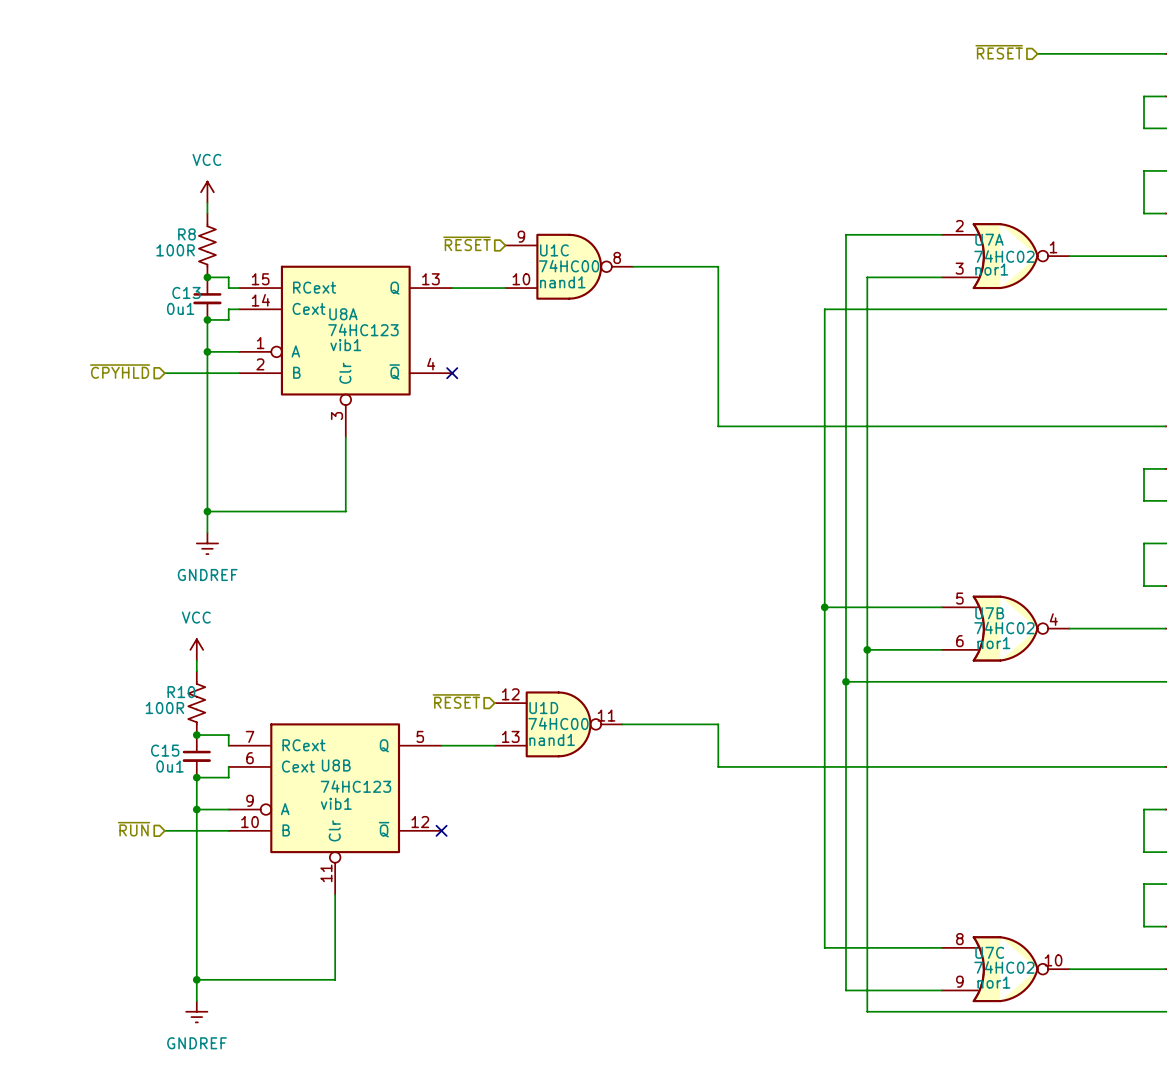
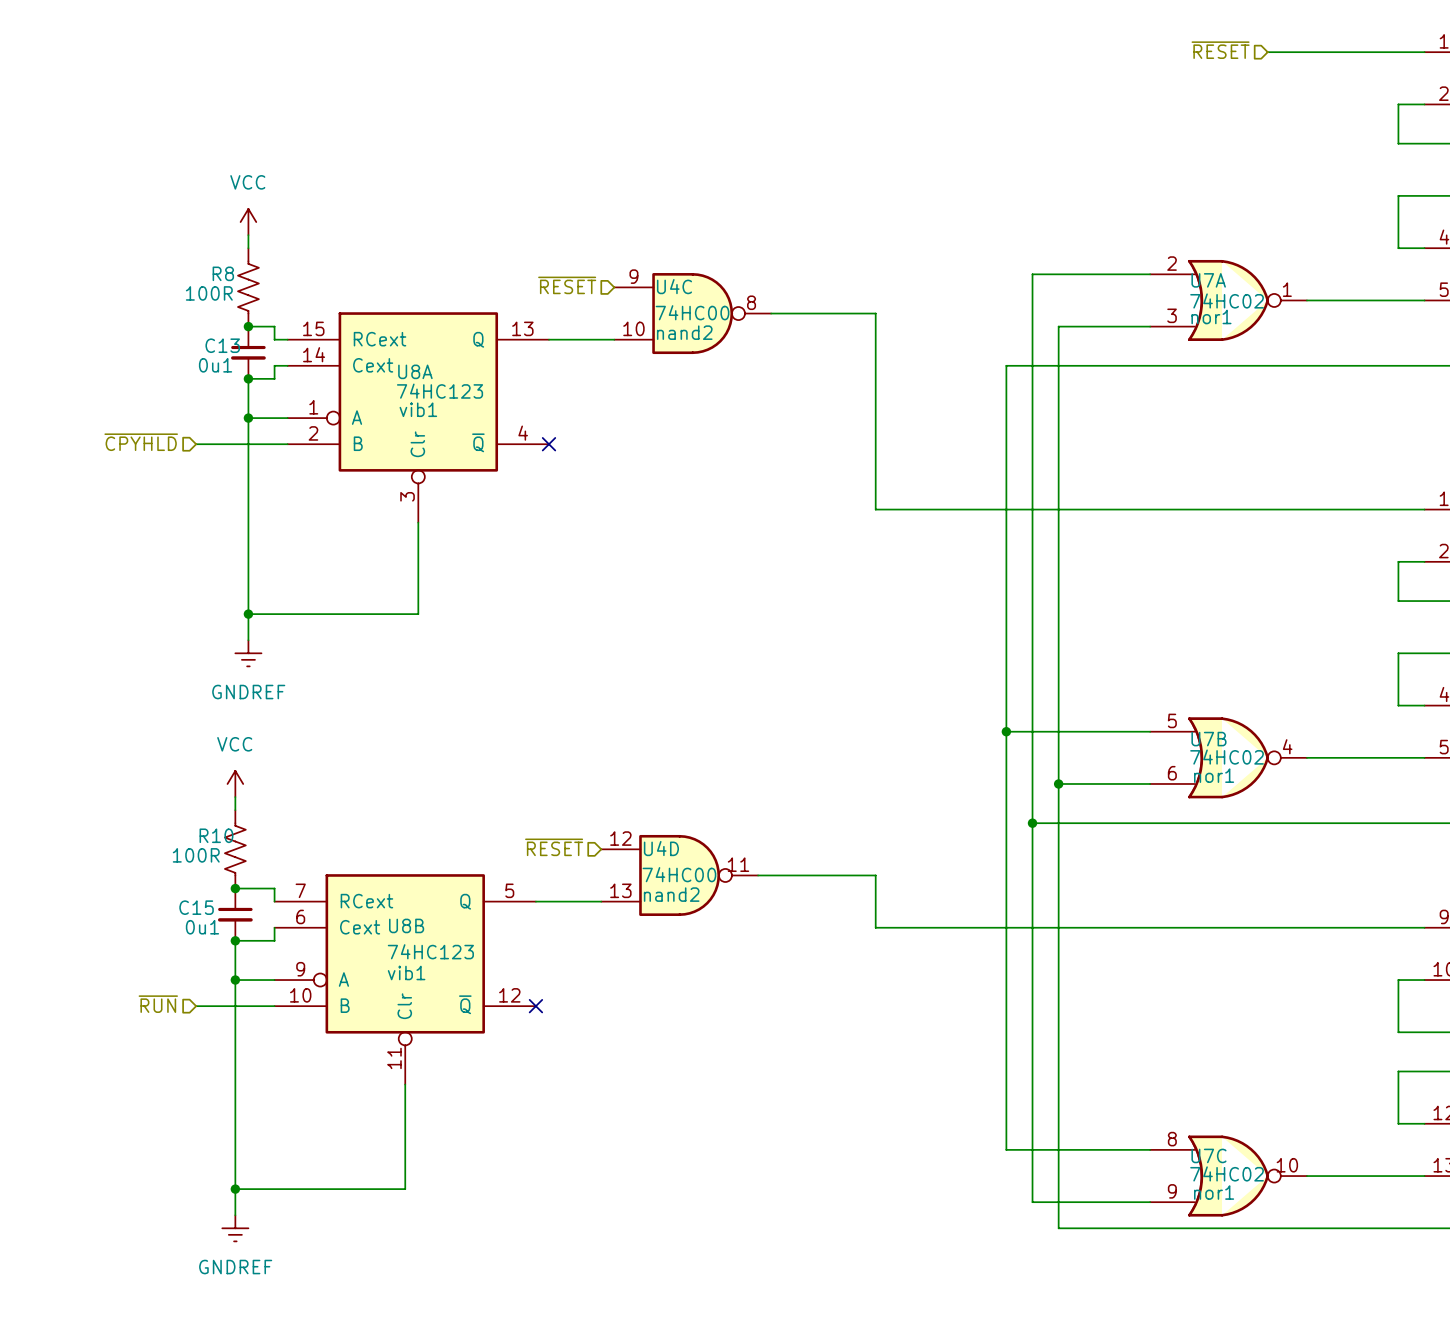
U1C name: U1C (554, 250) -> U4C (674, 286)
U1C text: nand1 (562, 282) -> nand2 (684, 332)
U1D name: U1D (543, 708) -> U4D (661, 848)
U1D text: nand1 (552, 739) -> nand2 (671, 894)

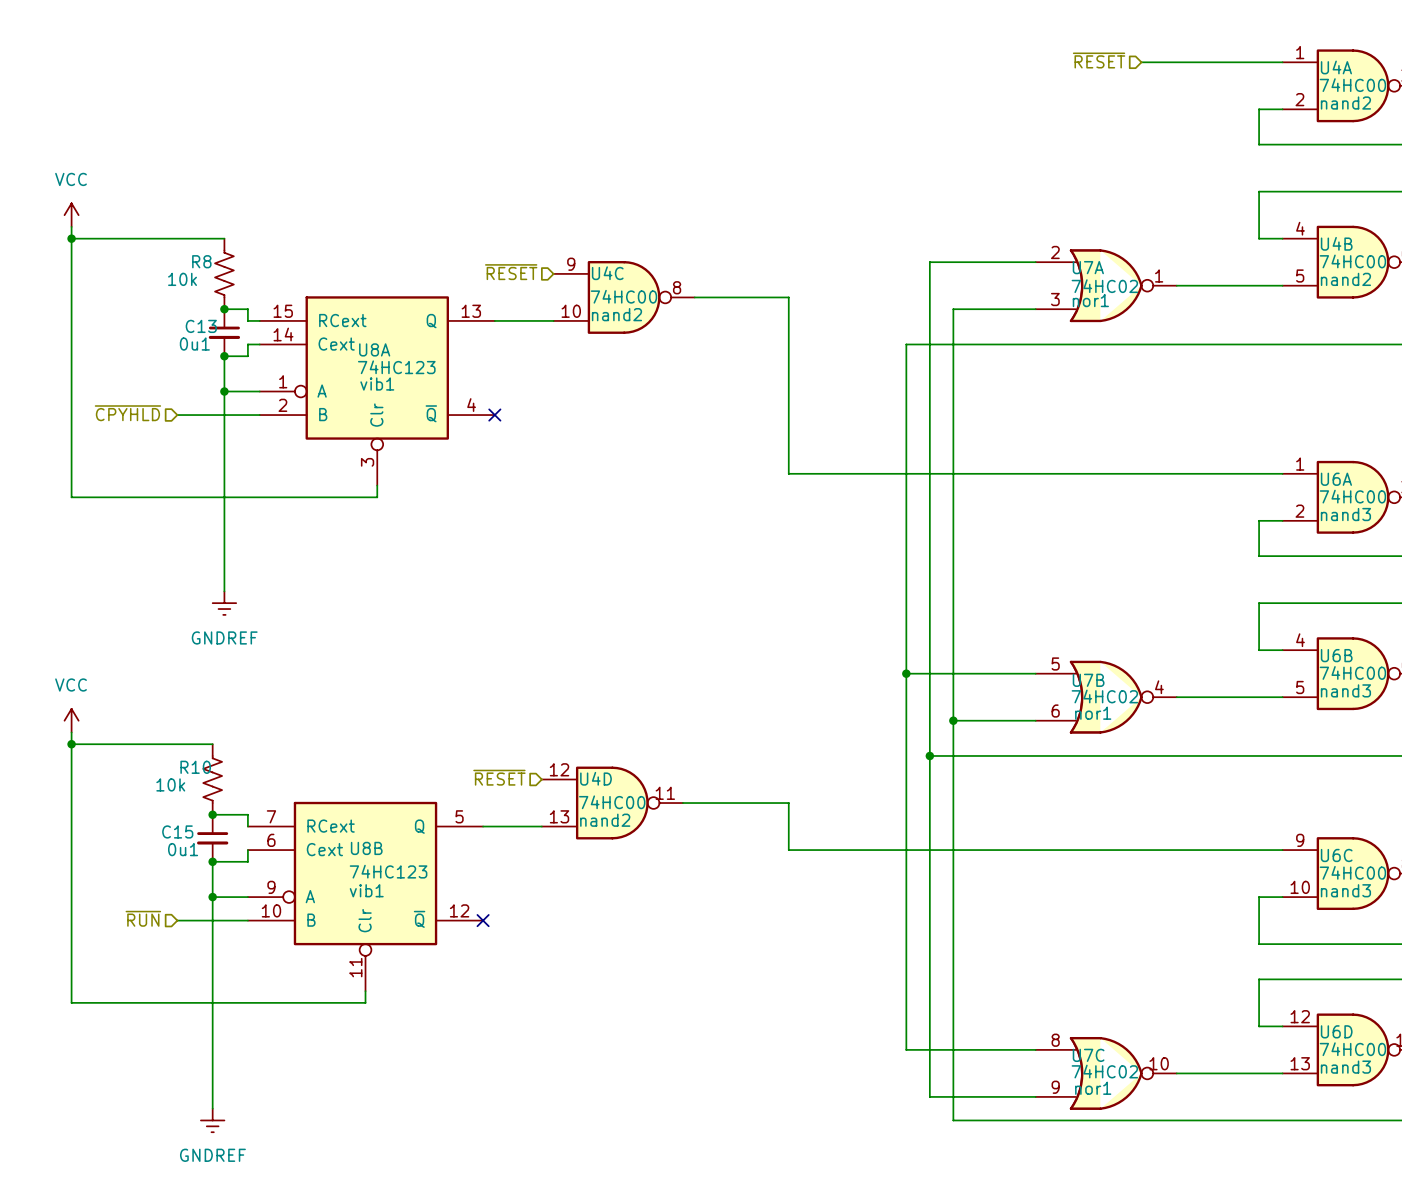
power symbol position: VCC (248, 222) -> VCC (71, 215)
wire: (248, 235) (248, 248) -> (71, 238) (224, 238)
junction: none -> (71, 238)
R8 value: 100R (209, 293) -> 10k (182, 279)
wire: (418, 535) (418, 614) (248, 614) -> (377, 497) (71, 497) (71, 226)
junction: (248, 614) -> none
power symbol position: VCC (235, 783) -> VCC (71, 720)
wire: (235, 797) (235, 810) -> (71, 744) (212, 744)
junction: none -> (71, 744)
R10 value: 100R (196, 855) -> 10k (170, 784)
wire: (405, 1097) (405, 1189) (235, 1189) -> (365, 1002) (71, 1002) (71, 732)
junction: (235, 1189) -> none

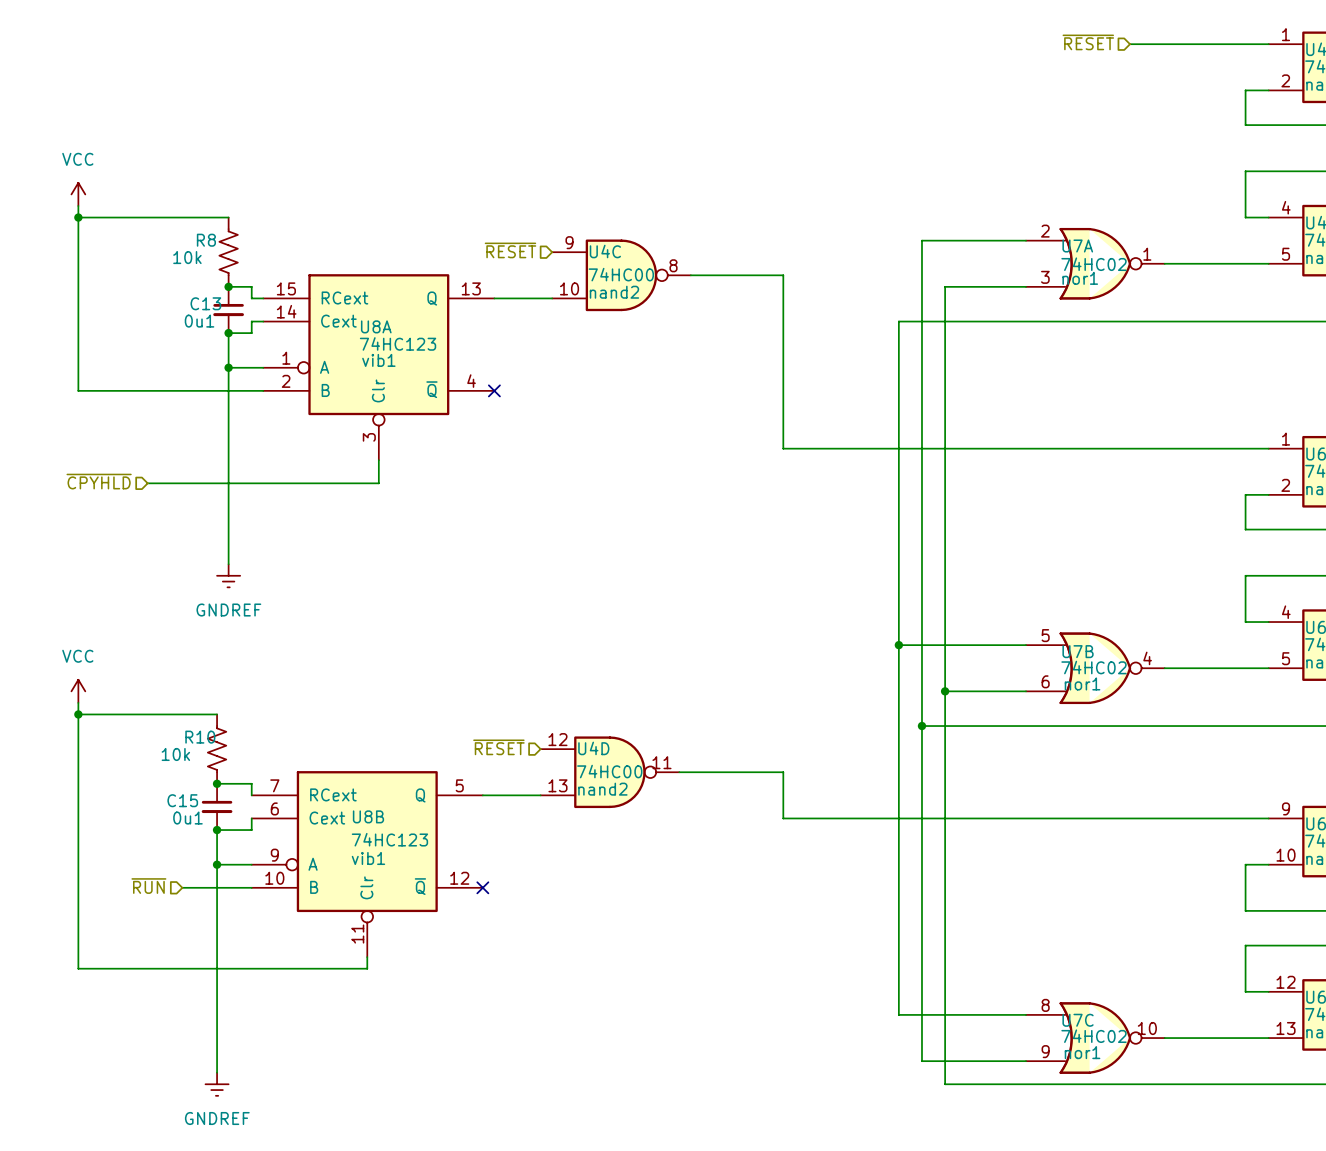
hierarchical label position: ~{CPYHLD} (127, 413) -> ~{CPYHLD} (99, 481)
wire: (71, 415) (71, 497) (377, 497) -> (147, 483) (378, 483) (378, 471)
wire: none -> (78, 390) (182, 390)

